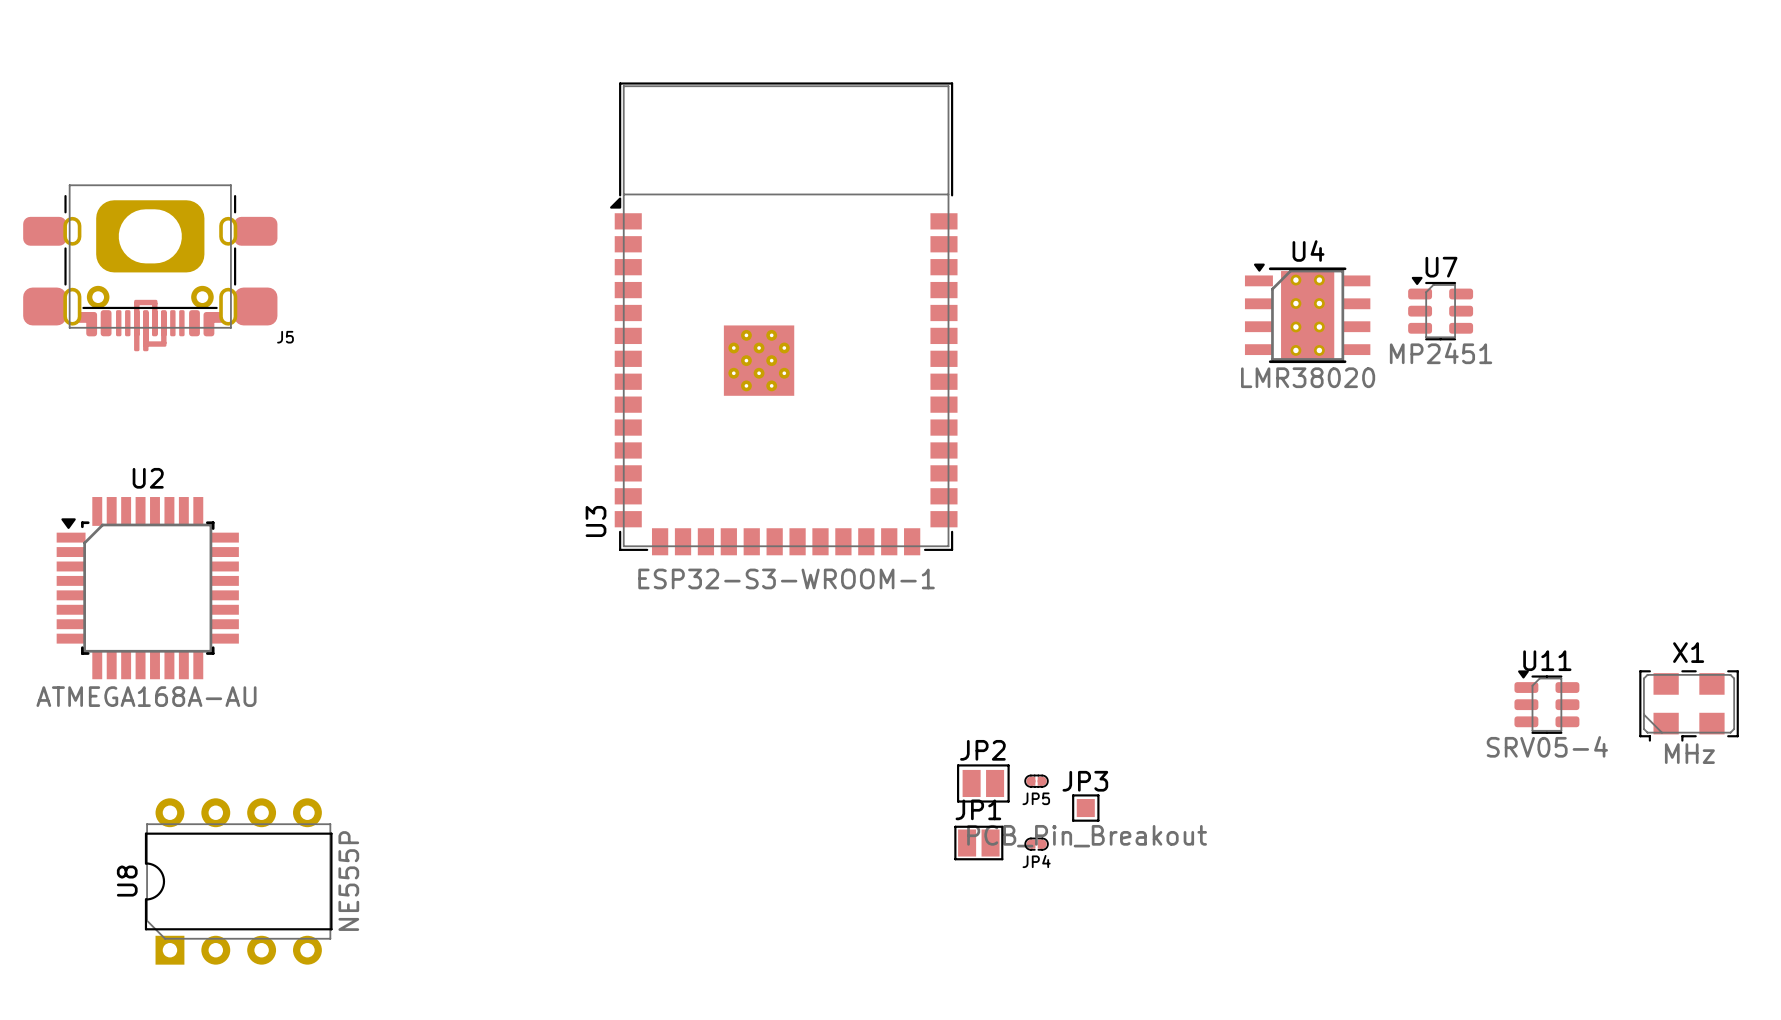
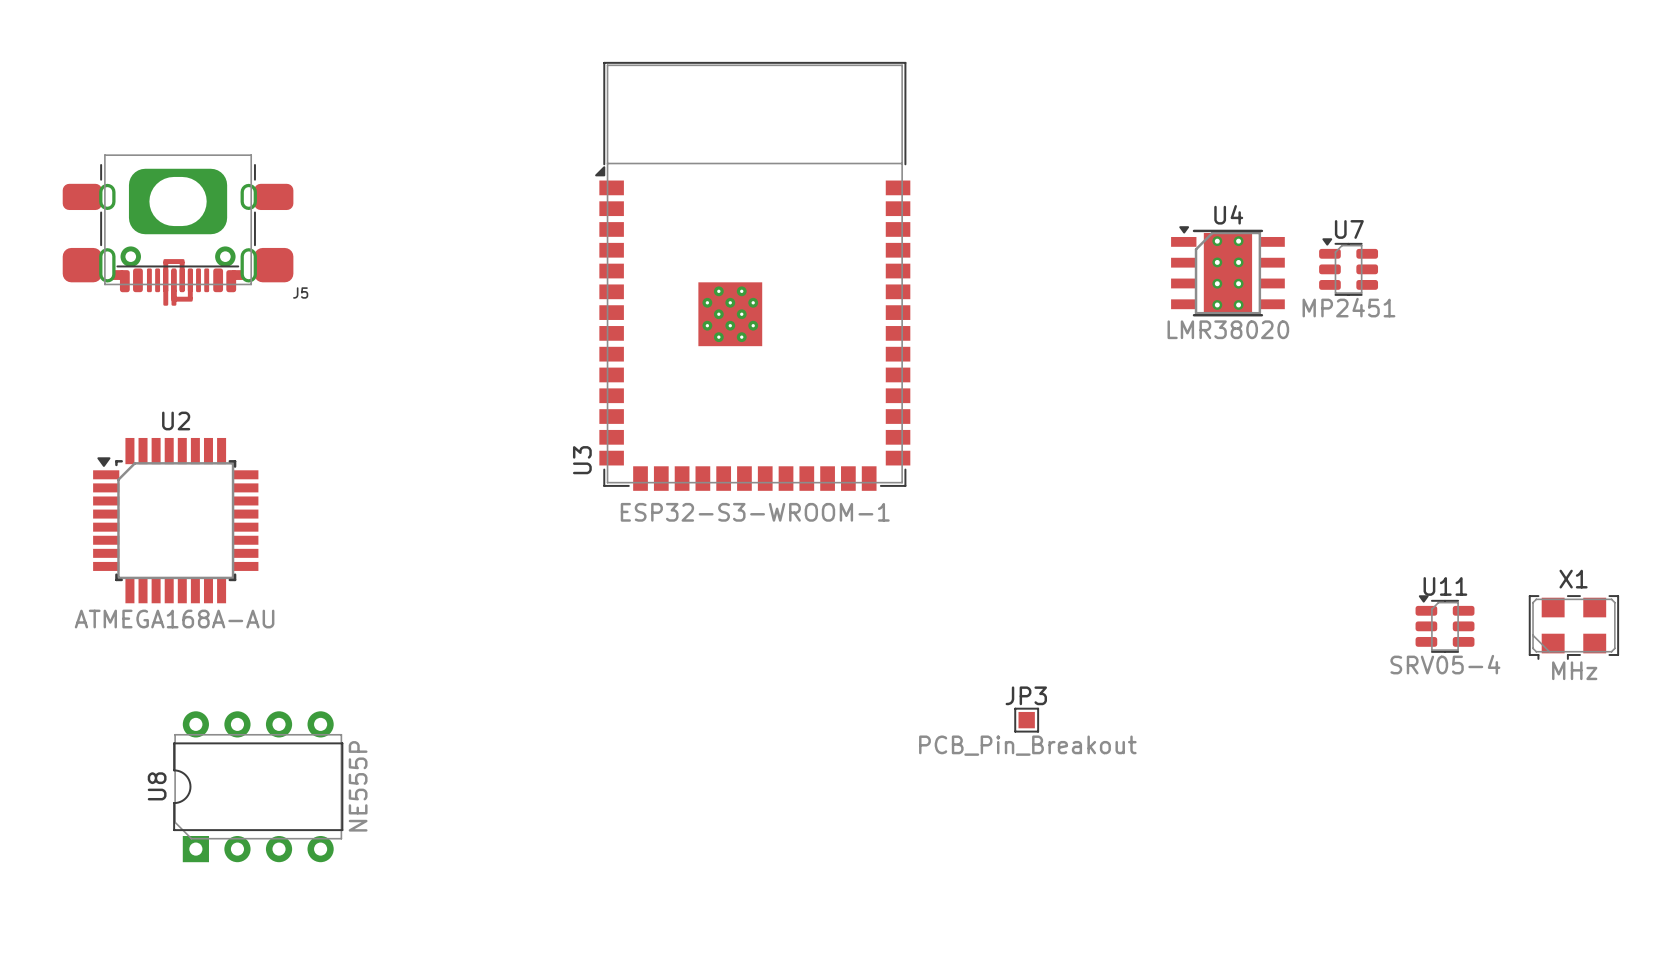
JP5: (1036, 781) -> none
JP2: (983, 783) -> none
JP1: (978, 843) -> none
JP4: (1036, 844) -> none

